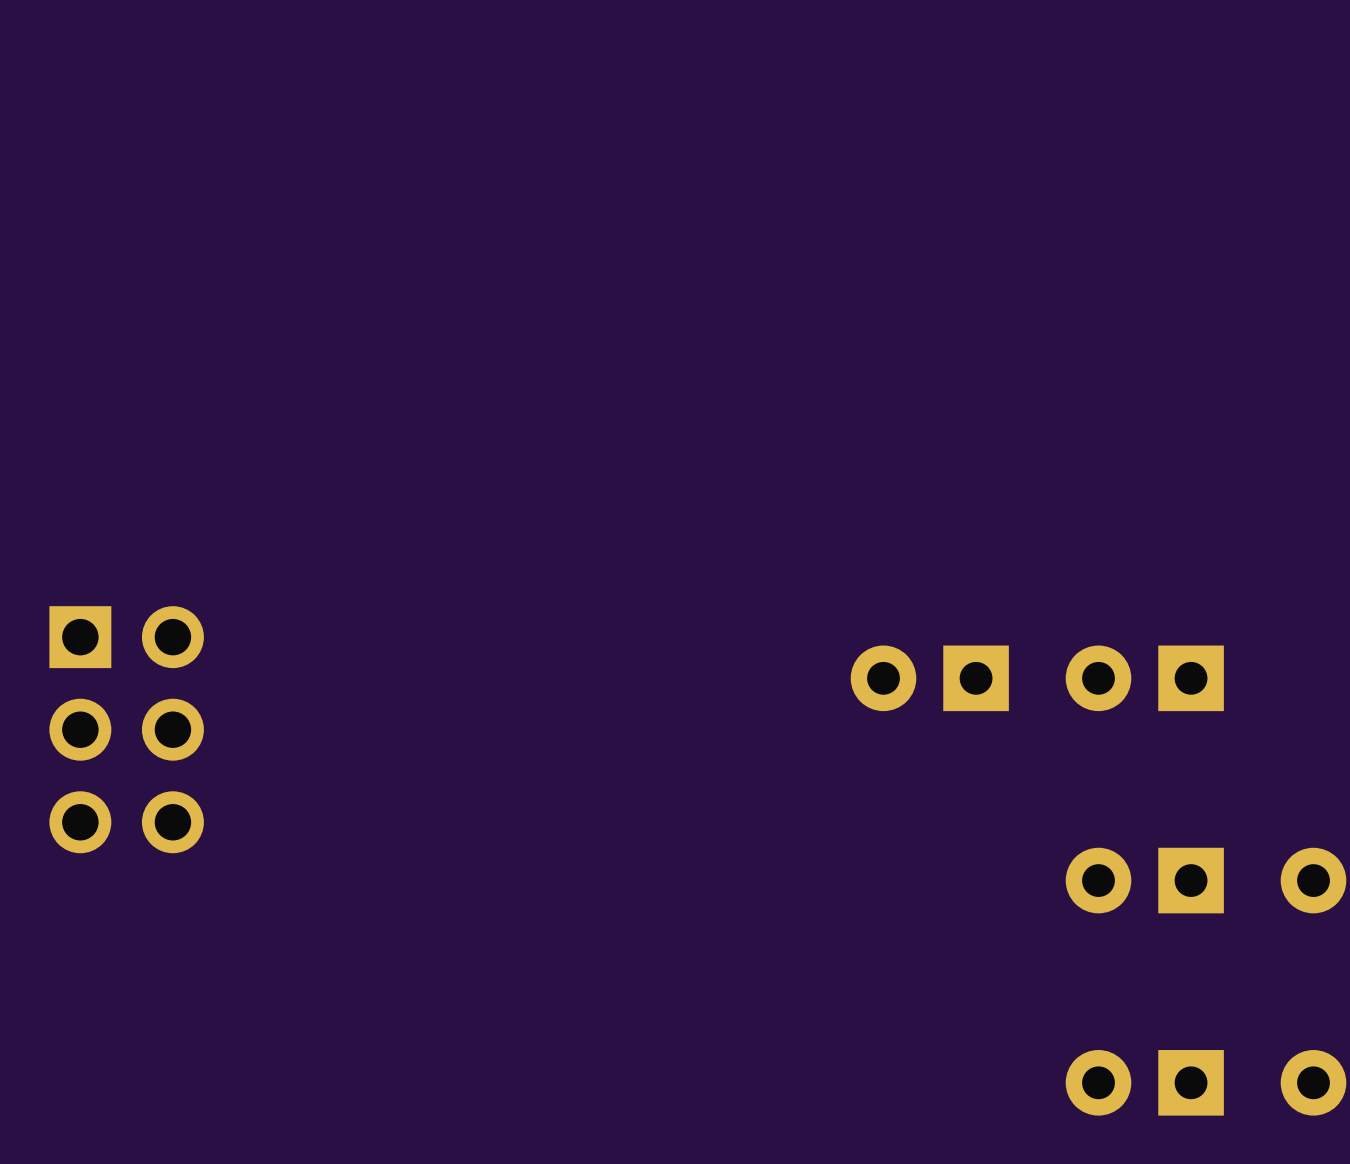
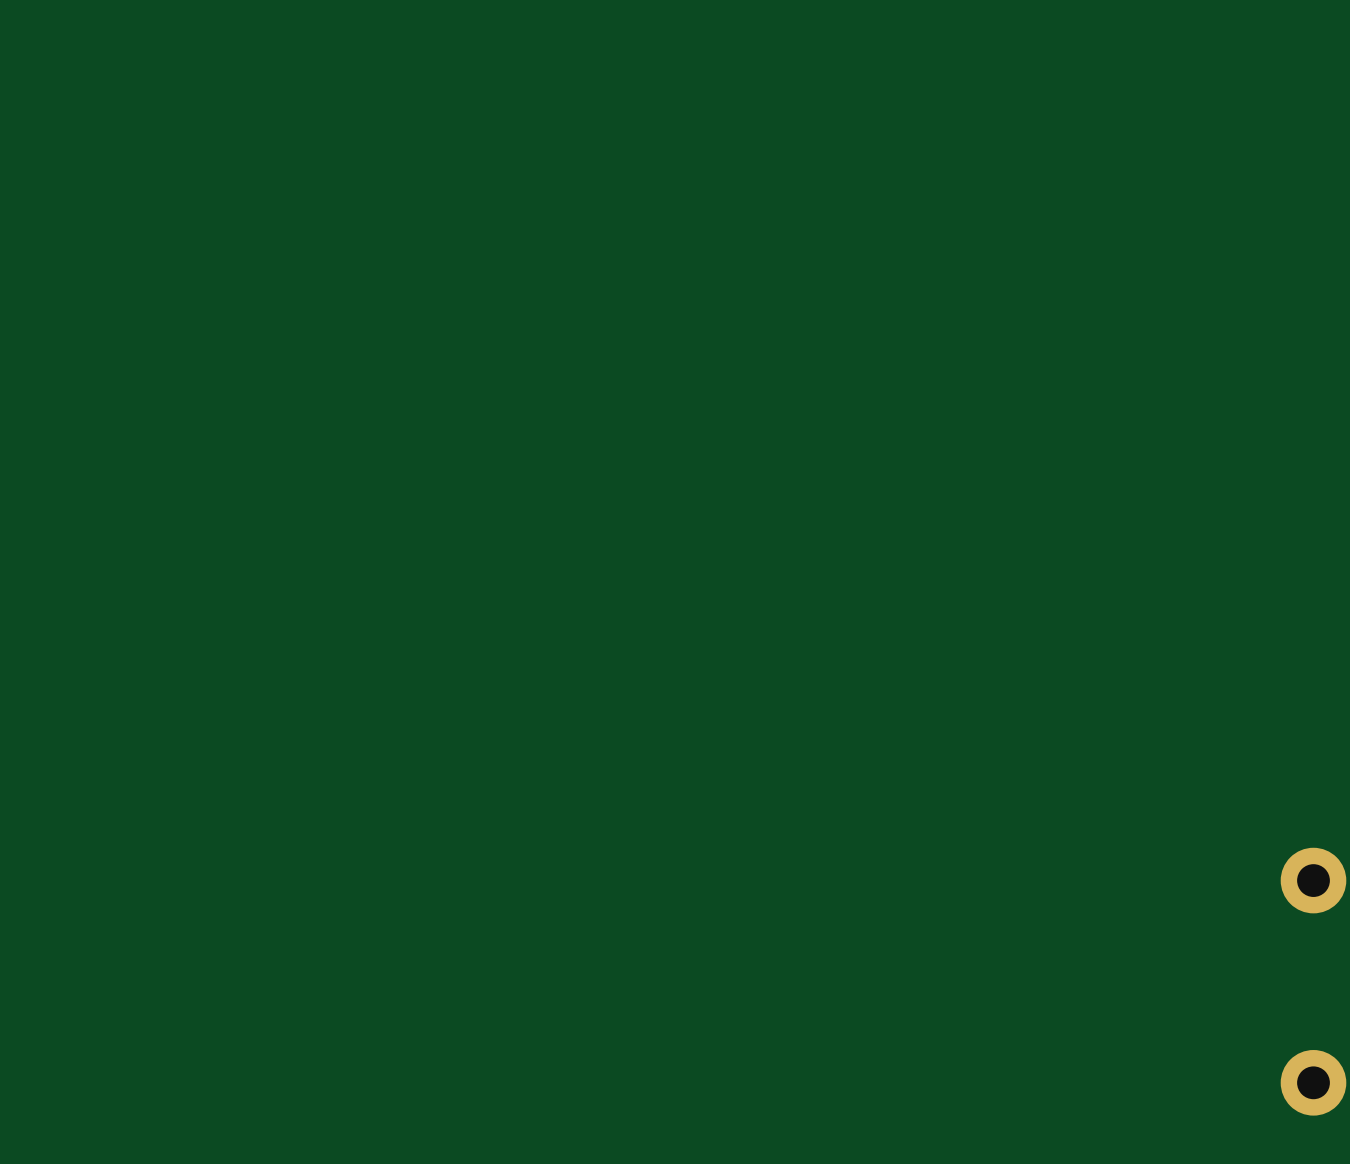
part: (929, 678) -> none
part: (1144, 678) -> none
part: (126, 729) -> none
part: (1144, 880) -> none
part: (1144, 1082) -> none

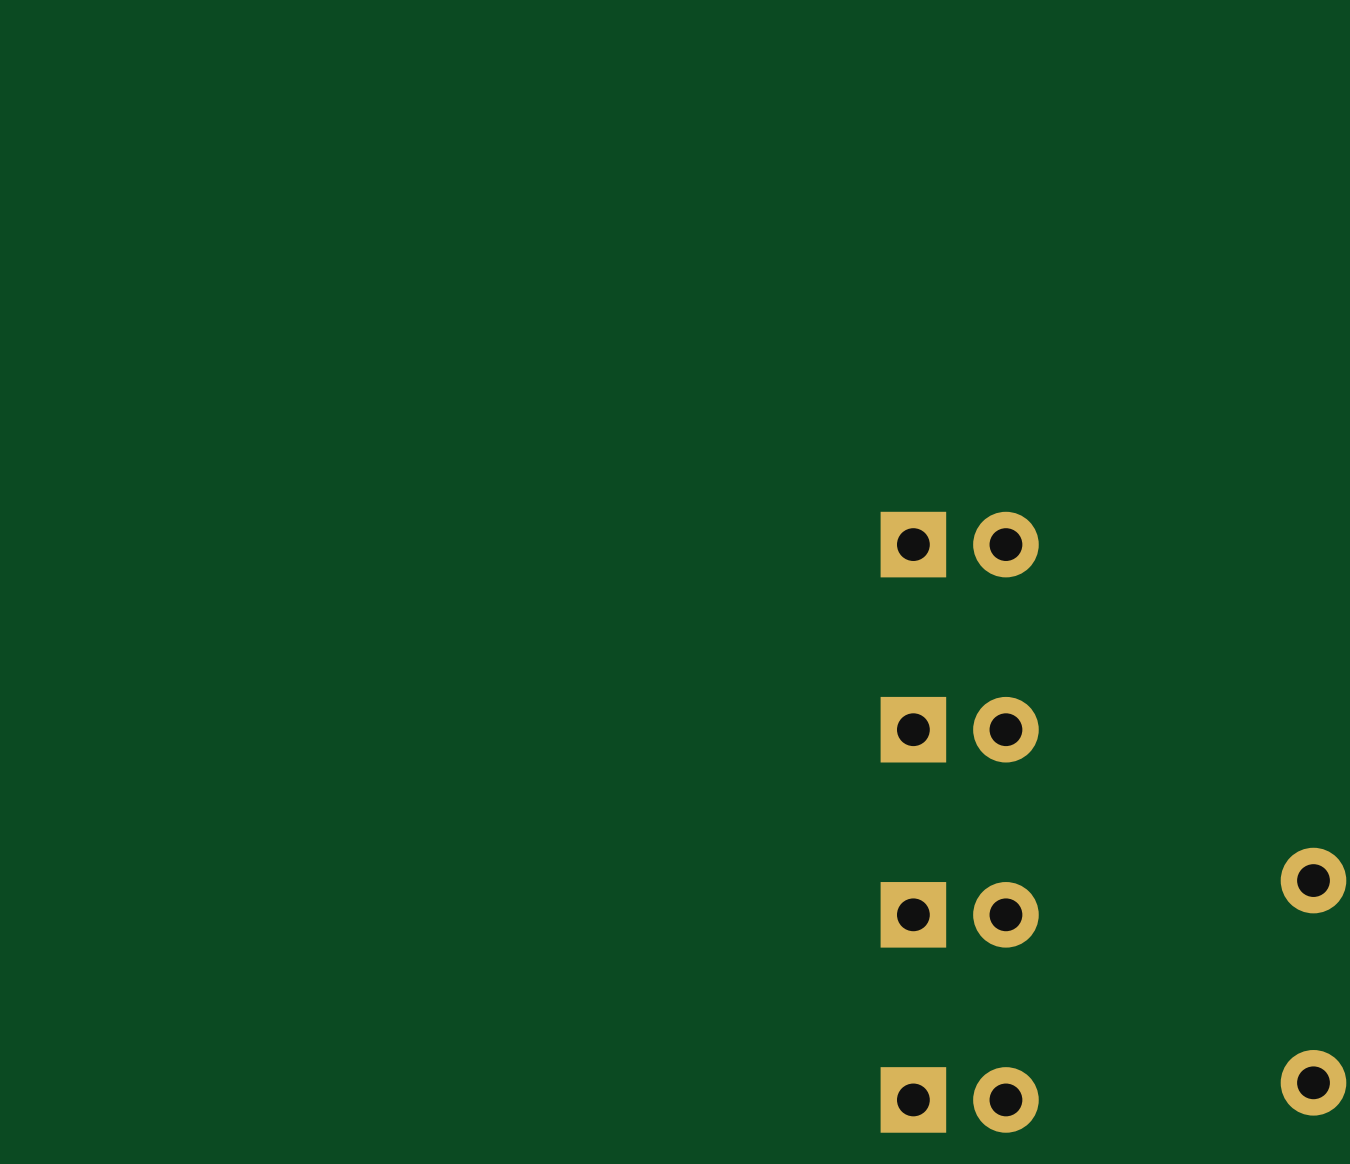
part: none -> (959, 544)
part: none -> (959, 729)
part: none -> (959, 914)
part: none -> (959, 1099)

